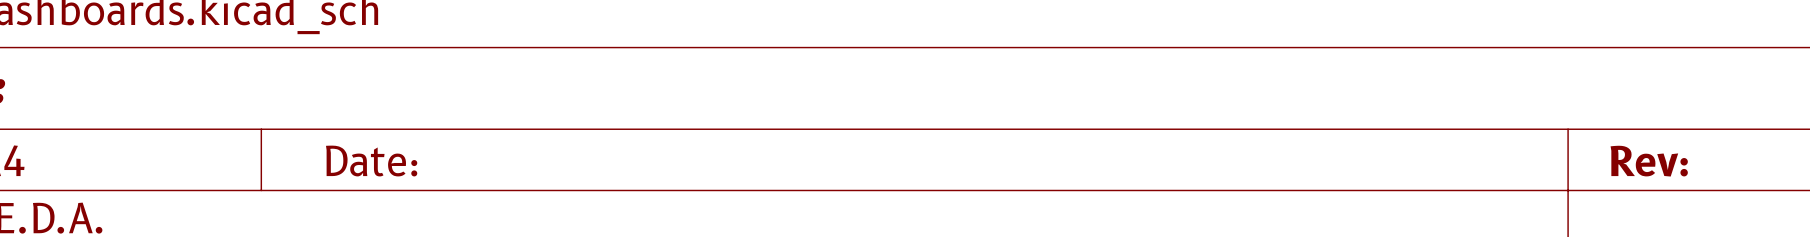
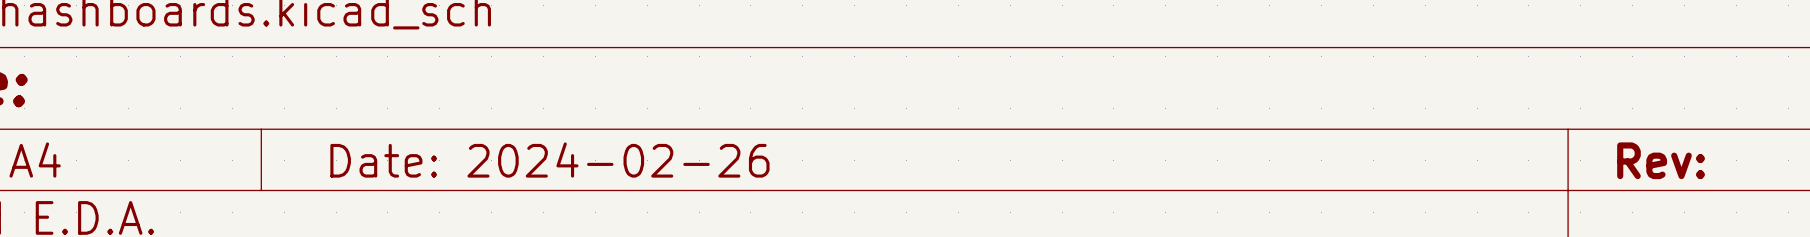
title block: Date: (371, 161) -> Date: 2024-02-26 (549, 160)

